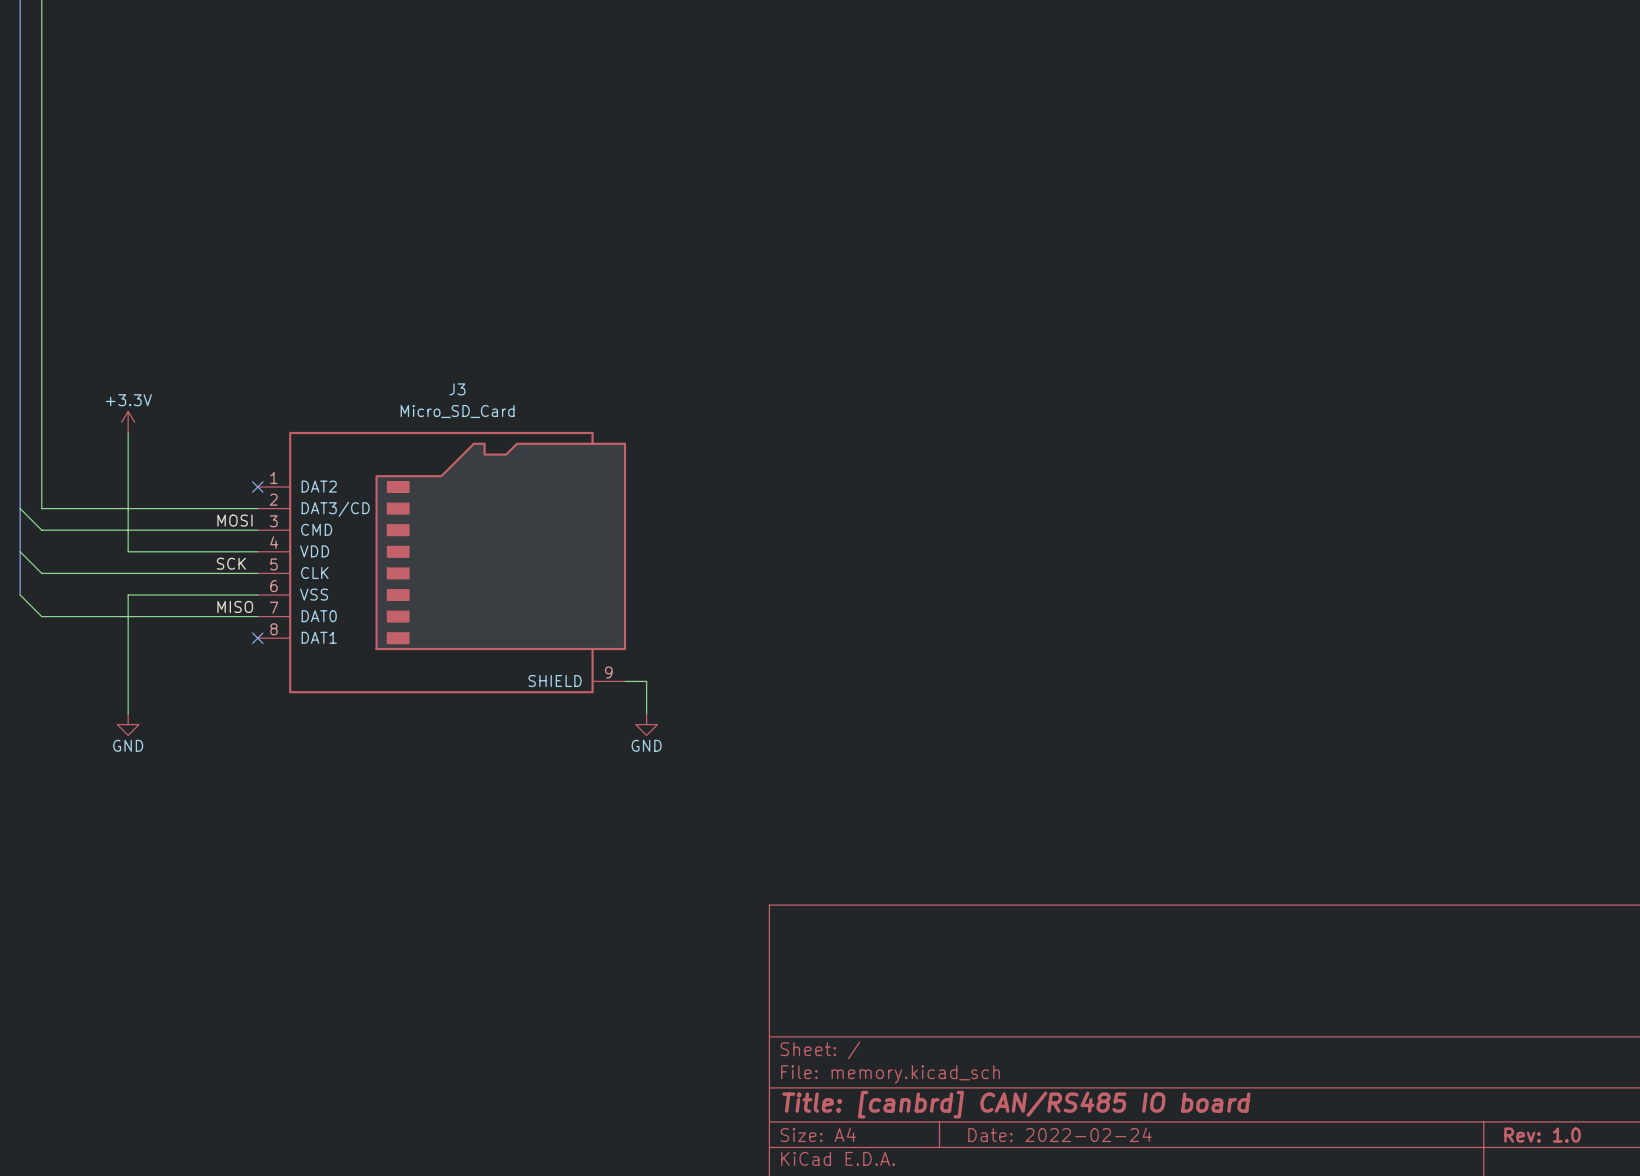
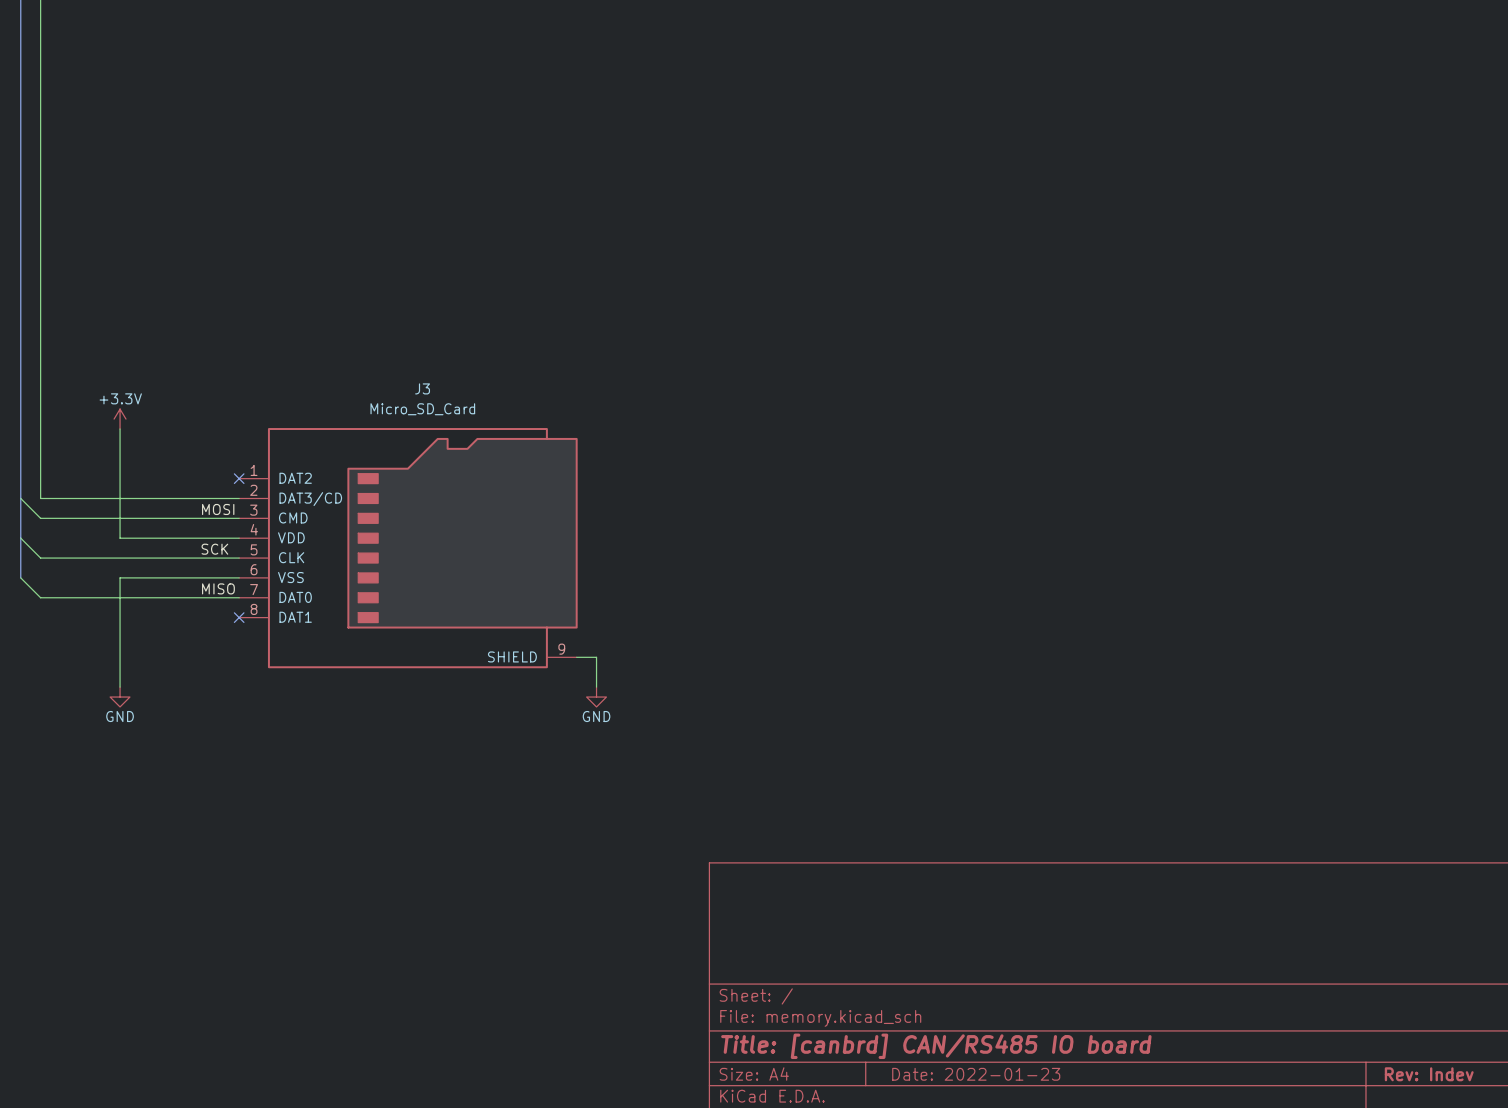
title block: Date: 2022-02-24 (1060, 1134) -> Date: 2022-01-23 (976, 1074)
title block: Rev: 1.0 (1542, 1135) -> Rev: Indev (1429, 1074)

